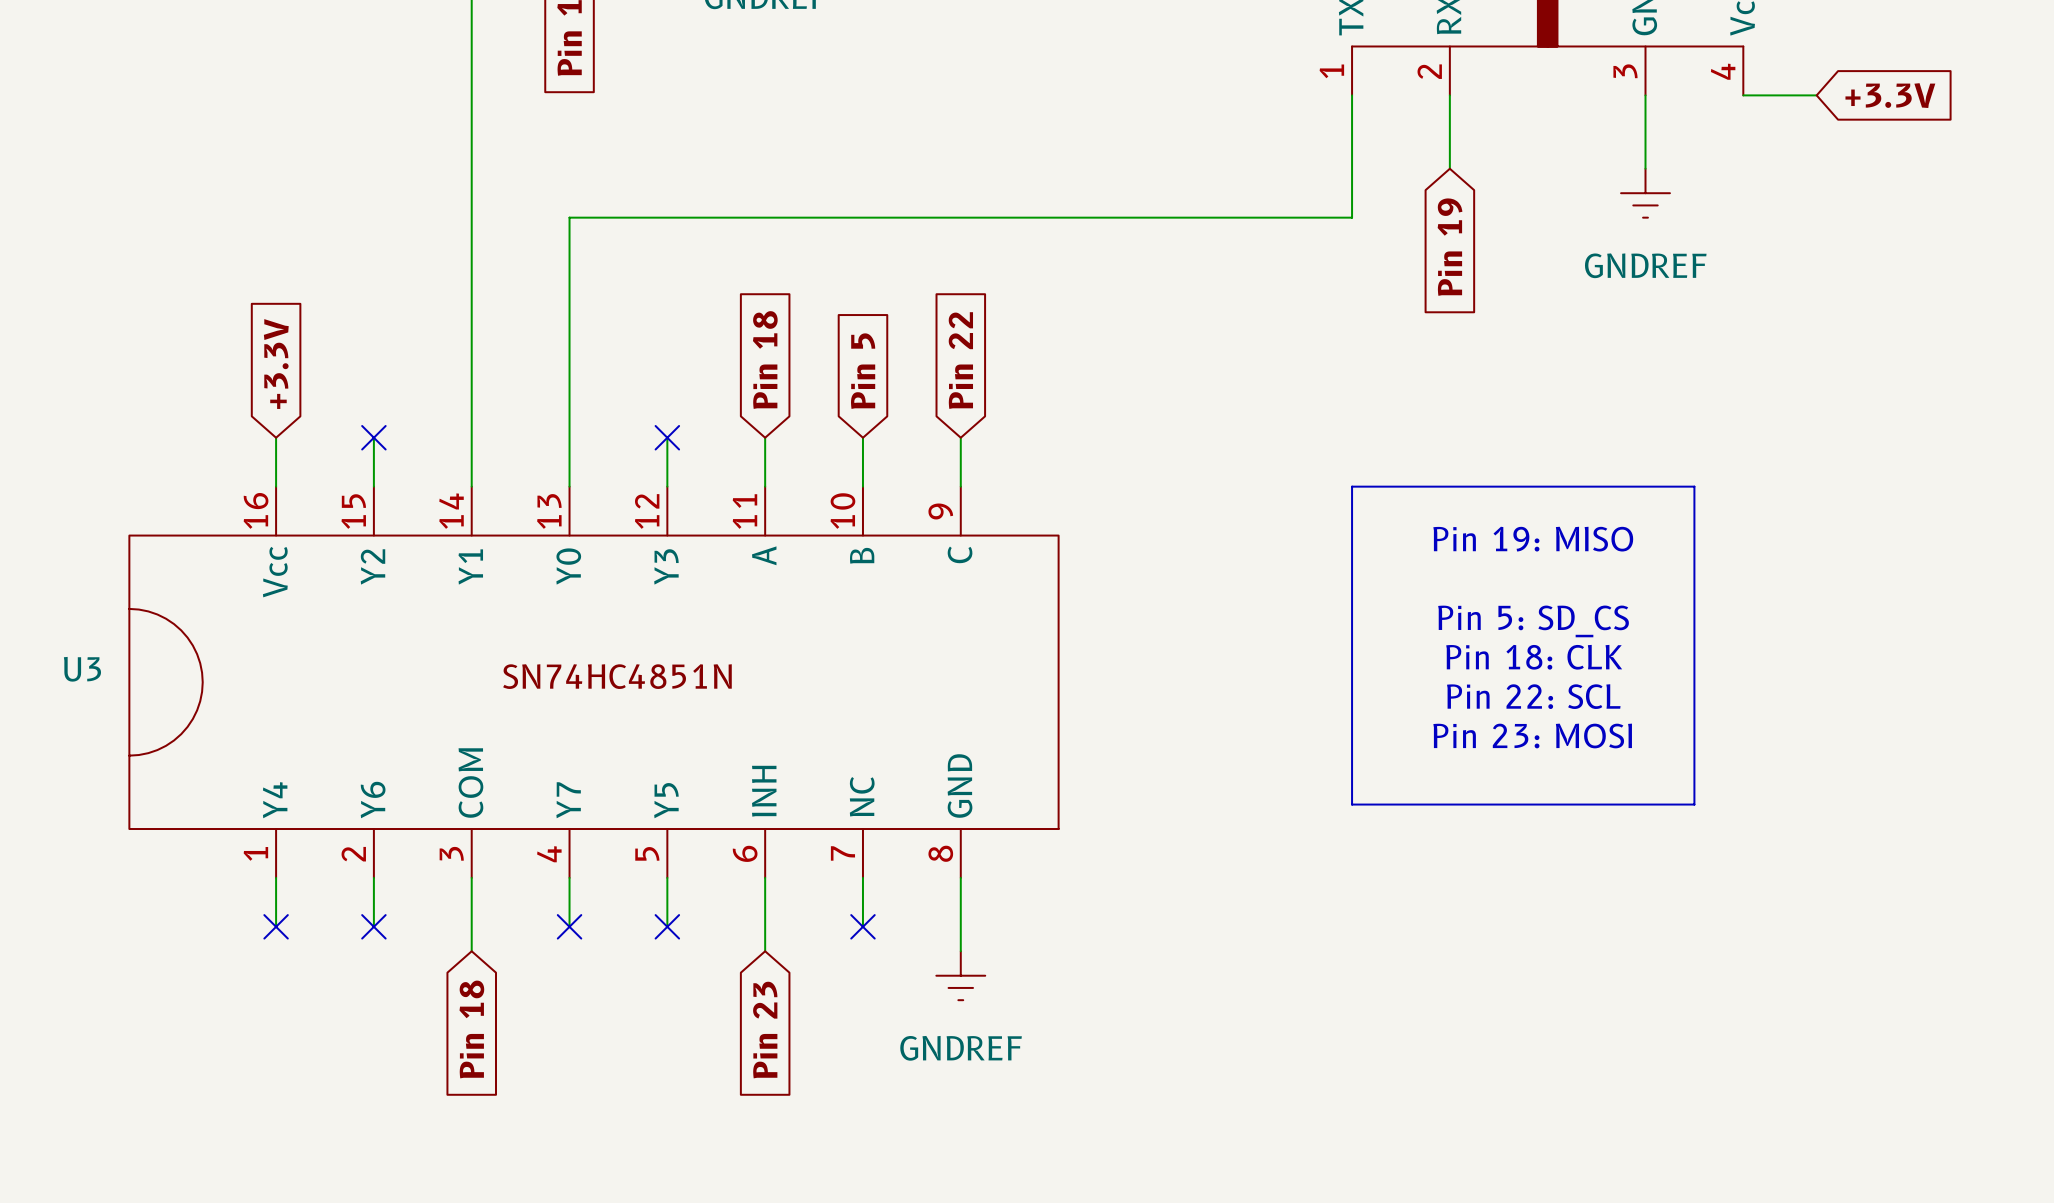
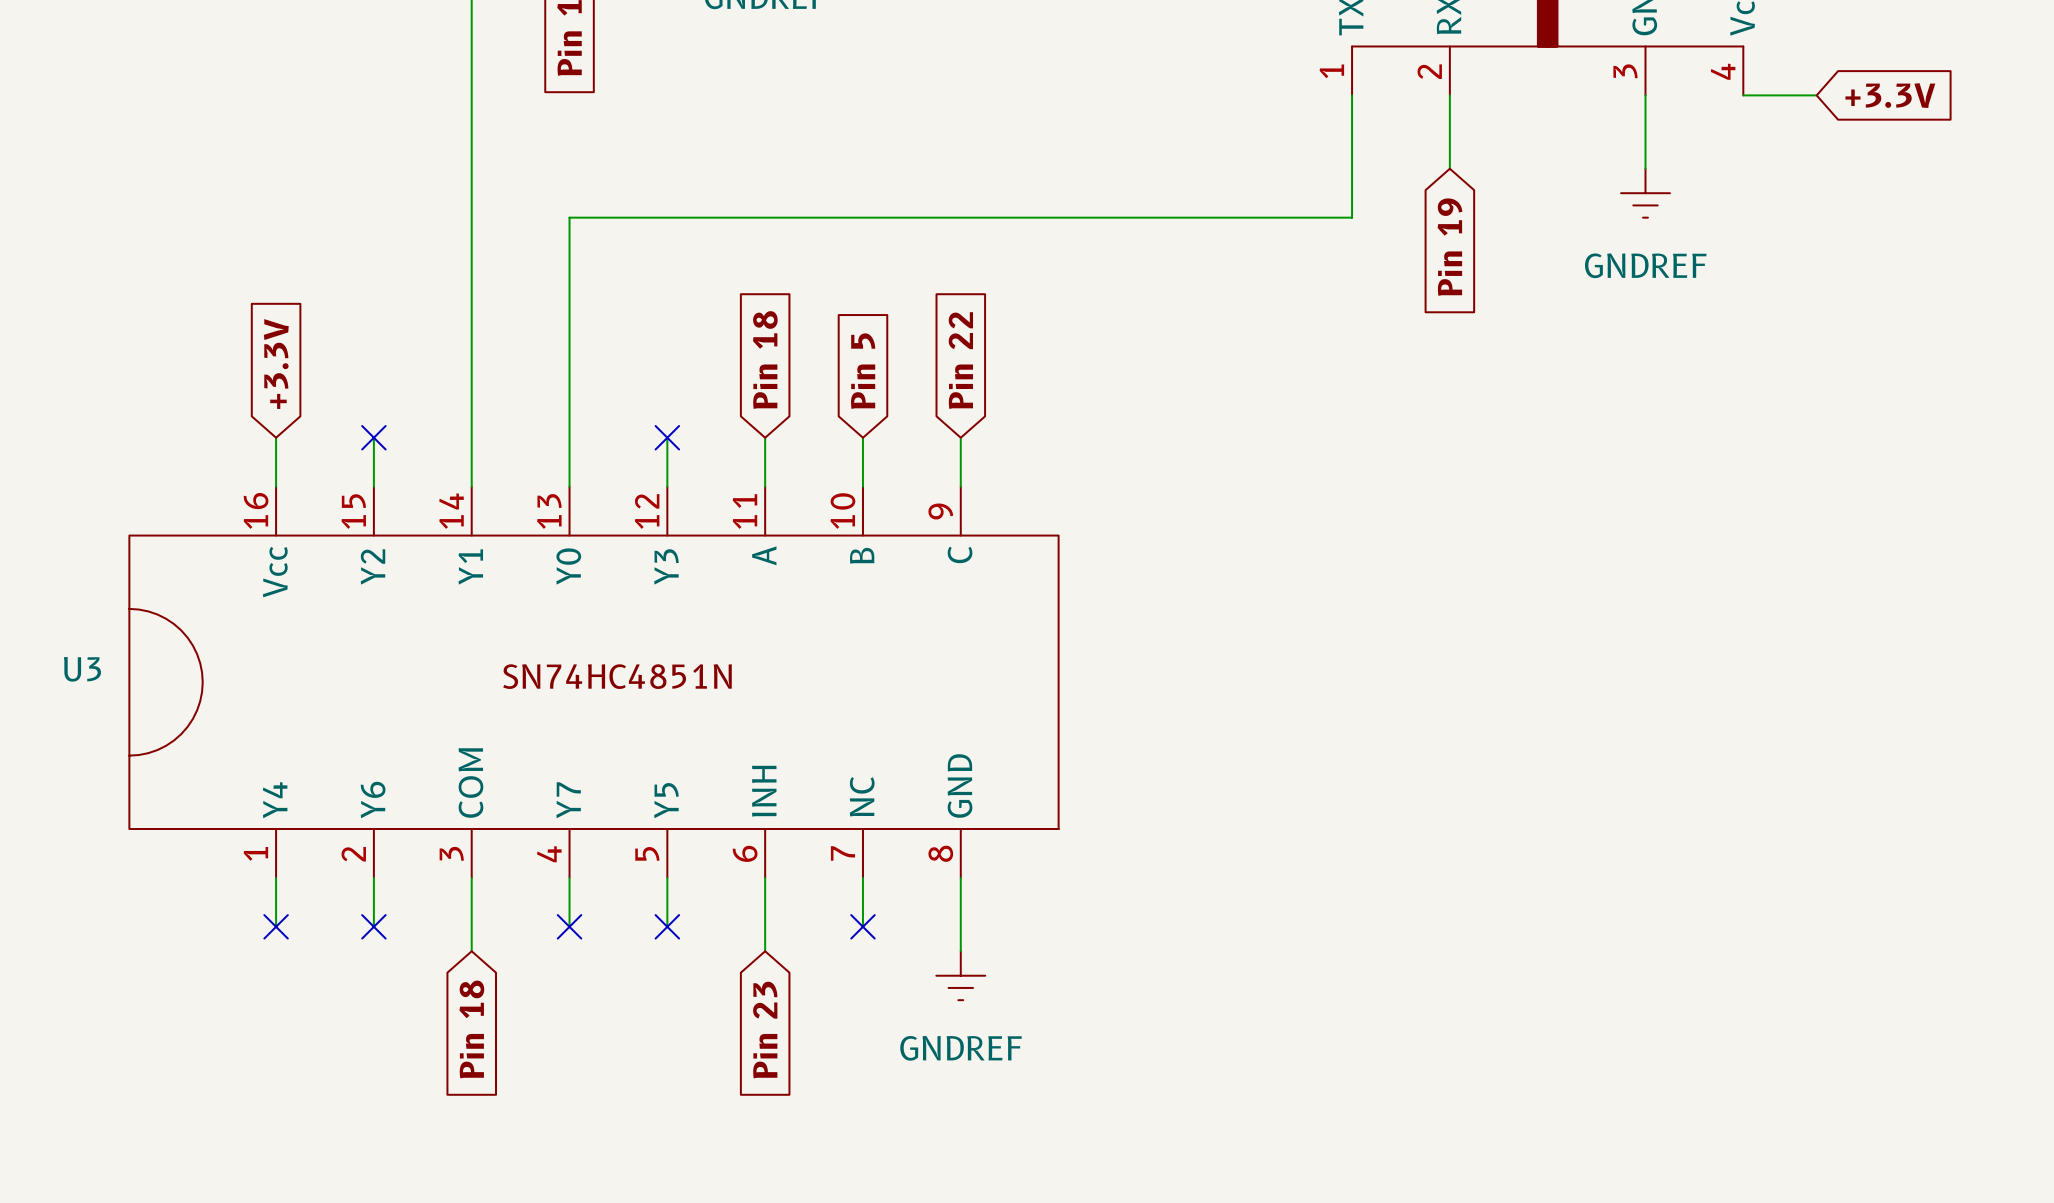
bus: (1352, 486) (1694, 486) (1694, 804) (1352, 804) (1352, 486) -> none
text: Pin 19: MISO (1533, 539) -> none
text: Pin 5: SD_CS (1533, 621) -> none
text: Pin 18: CLK (1534, 657) -> none
text: Pin 22: SCL (1533, 696) -> none
text: Pin 23: MOSI (1532, 735) -> none

